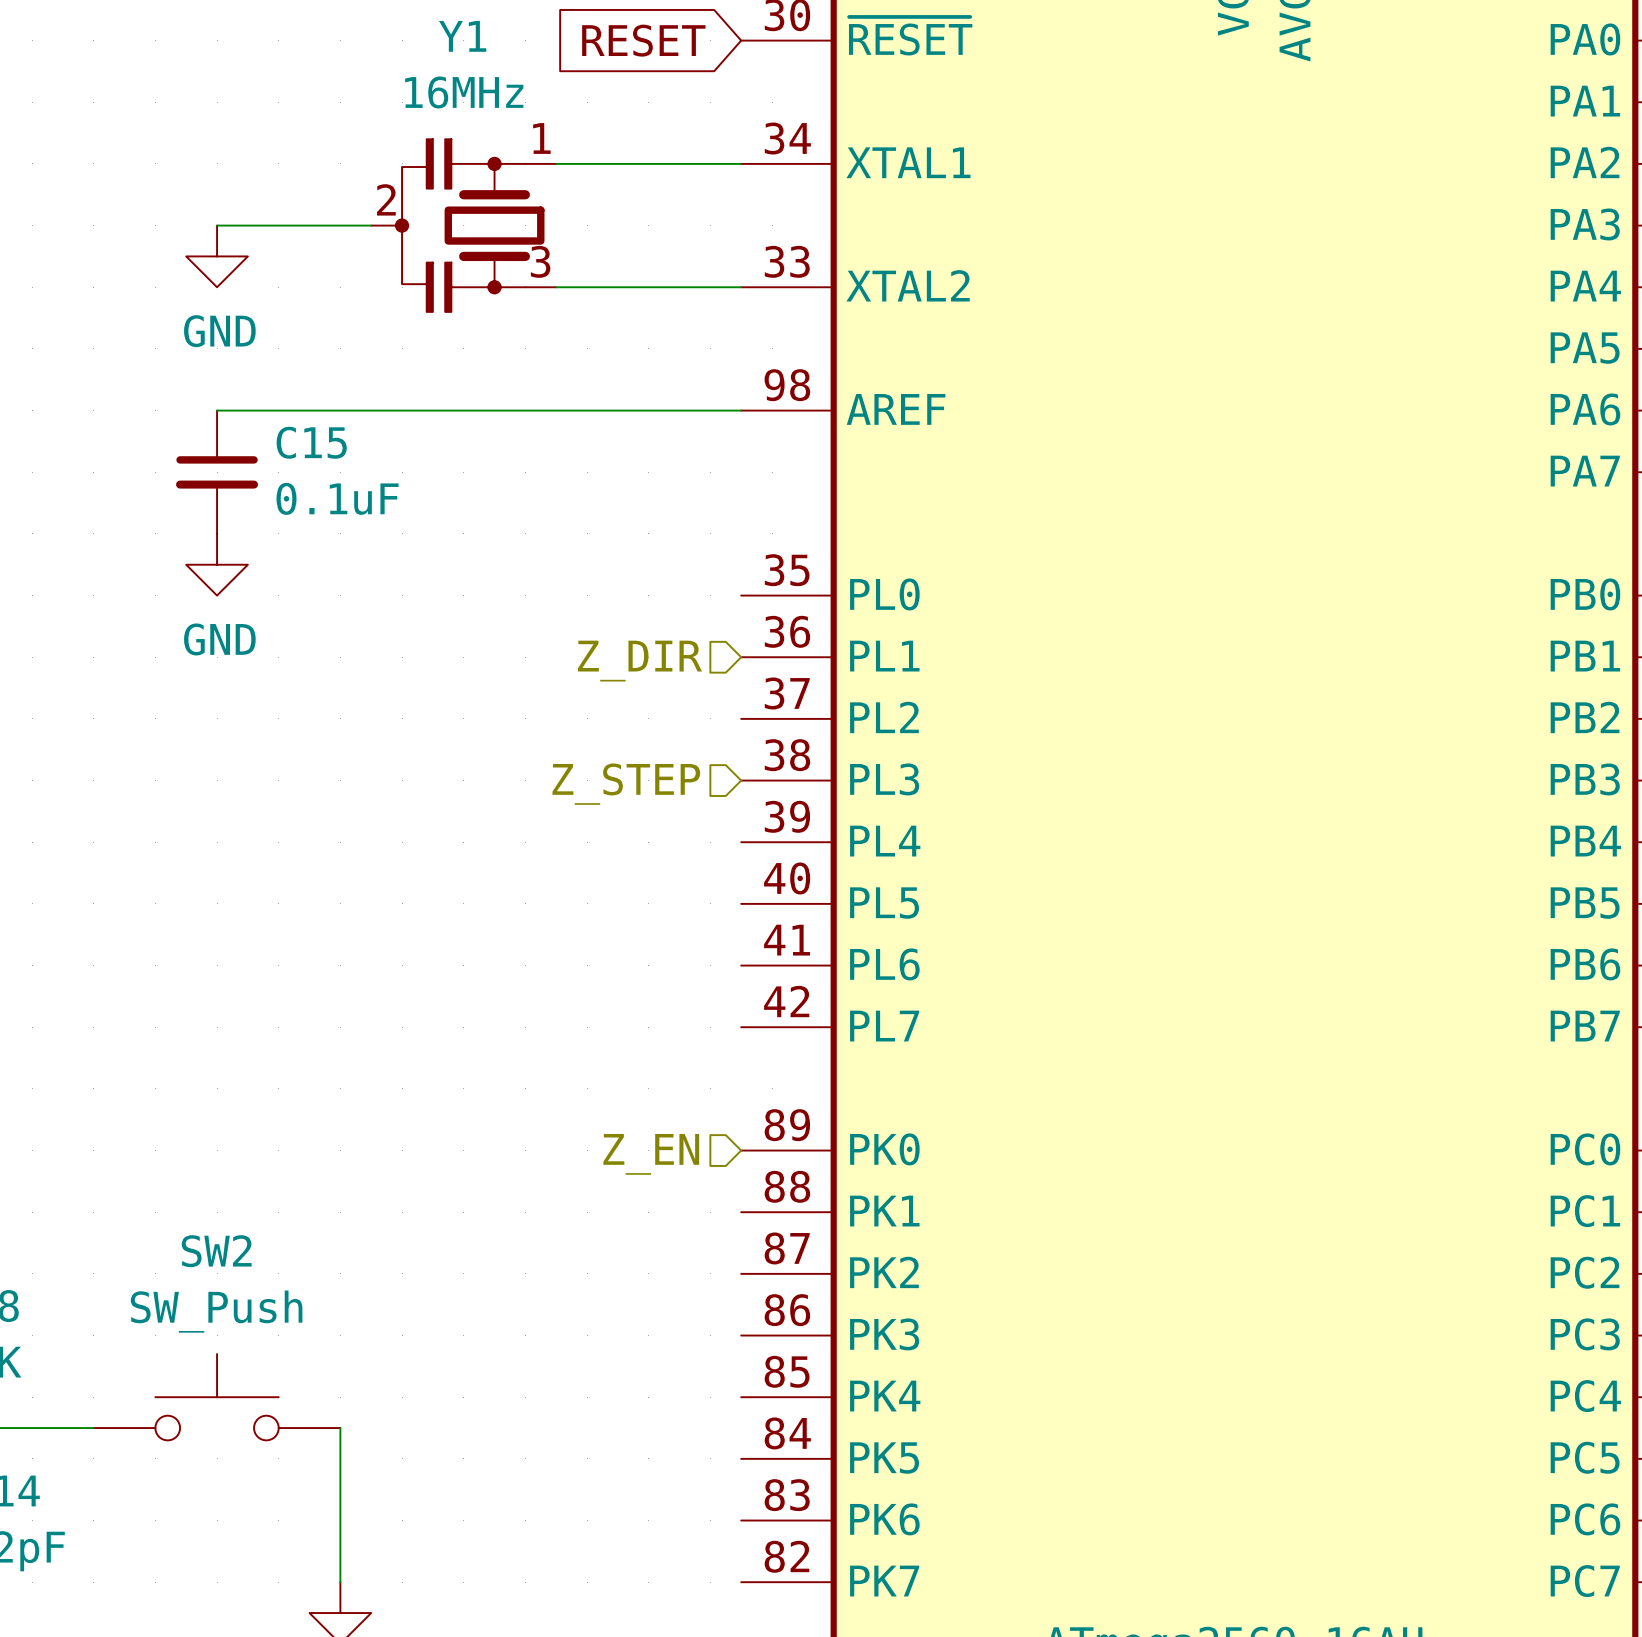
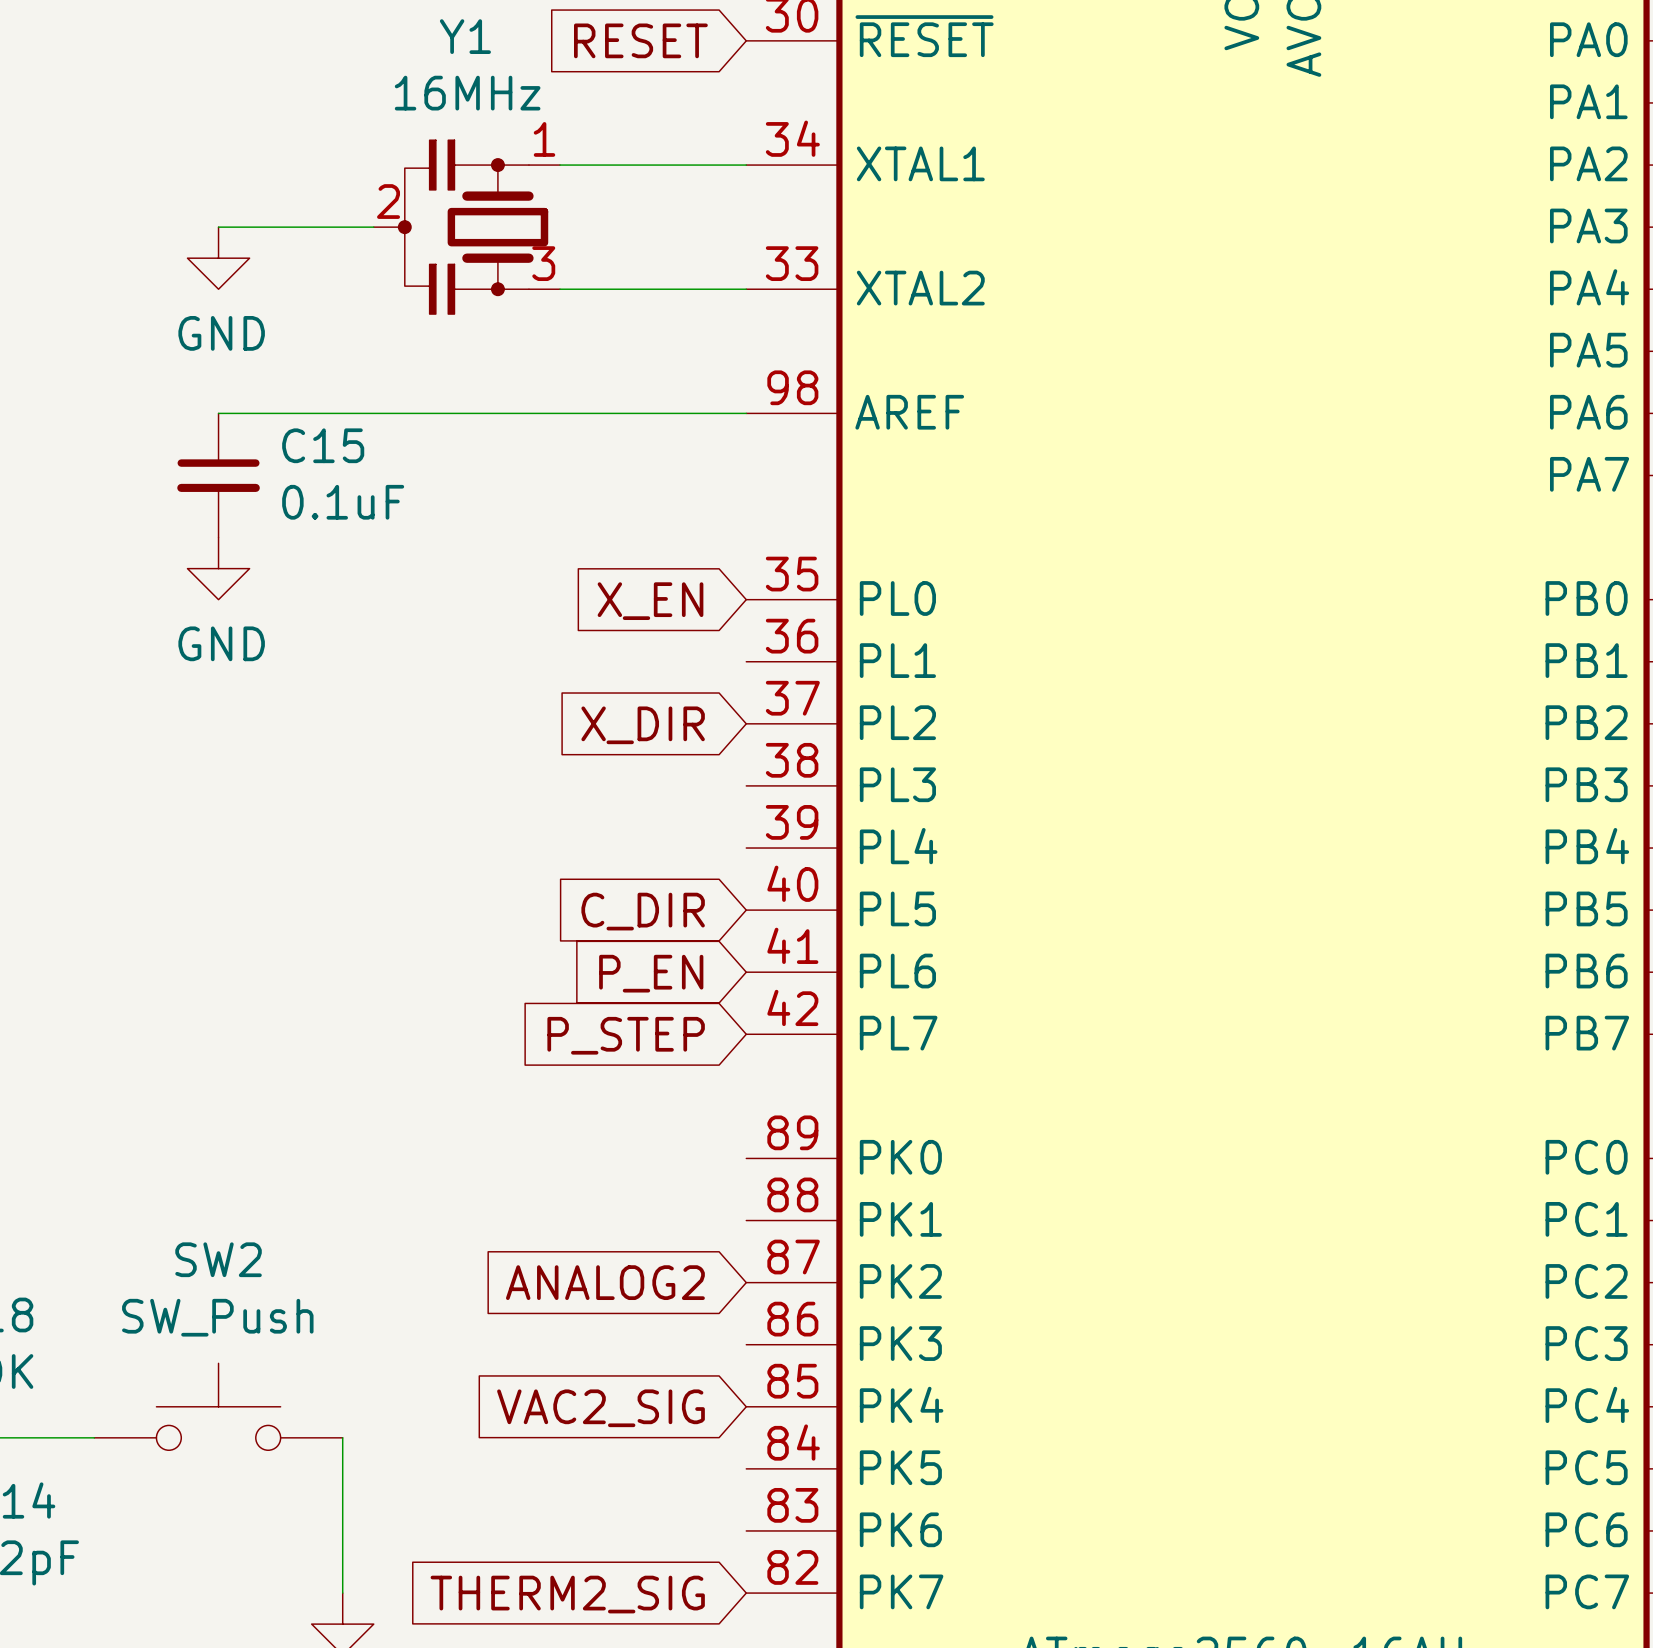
global label: none -> X_EN (650, 601)
hierarchical label: Z_DIR (639, 661) -> none
global label: none -> X_DIR (643, 725)
hierarchical label: Z_STEP (626, 784) -> none
global label: none -> C_DIR (643, 911)
global label: none -> P_EN (651, 973)
global label: none -> P_STEP (626, 1035)
hierarchical label: Z_EN (651, 1154) -> none
global label: none -> ANALOG2 (605, 1282)
global label: none -> VAC2_SIG (600, 1408)
global label: none -> THERM2_SIG (567, 1594)

